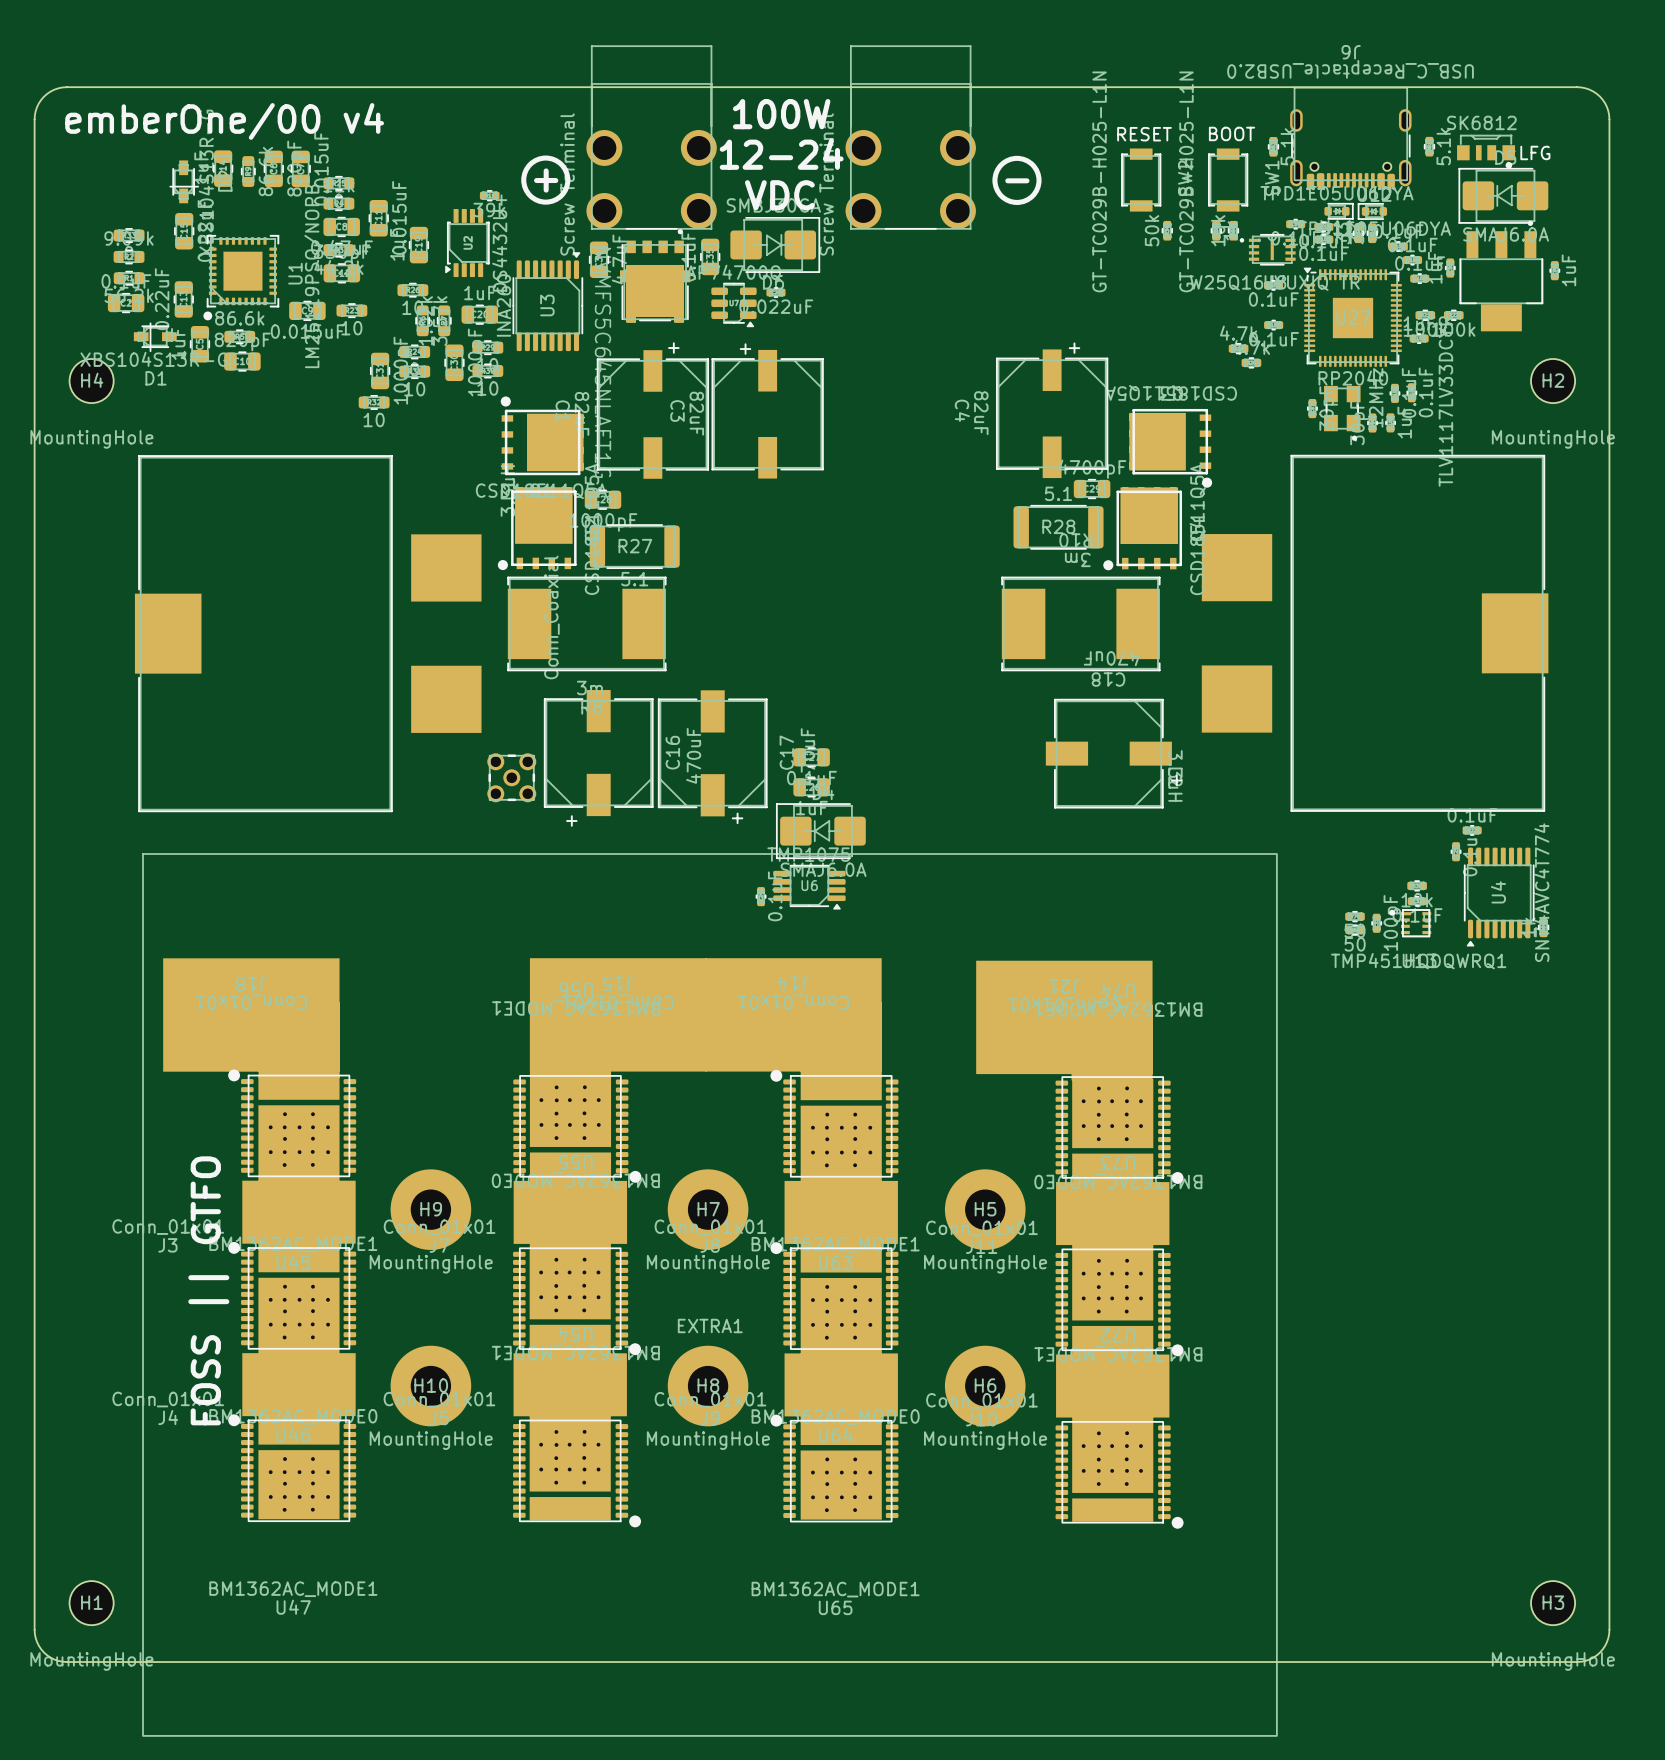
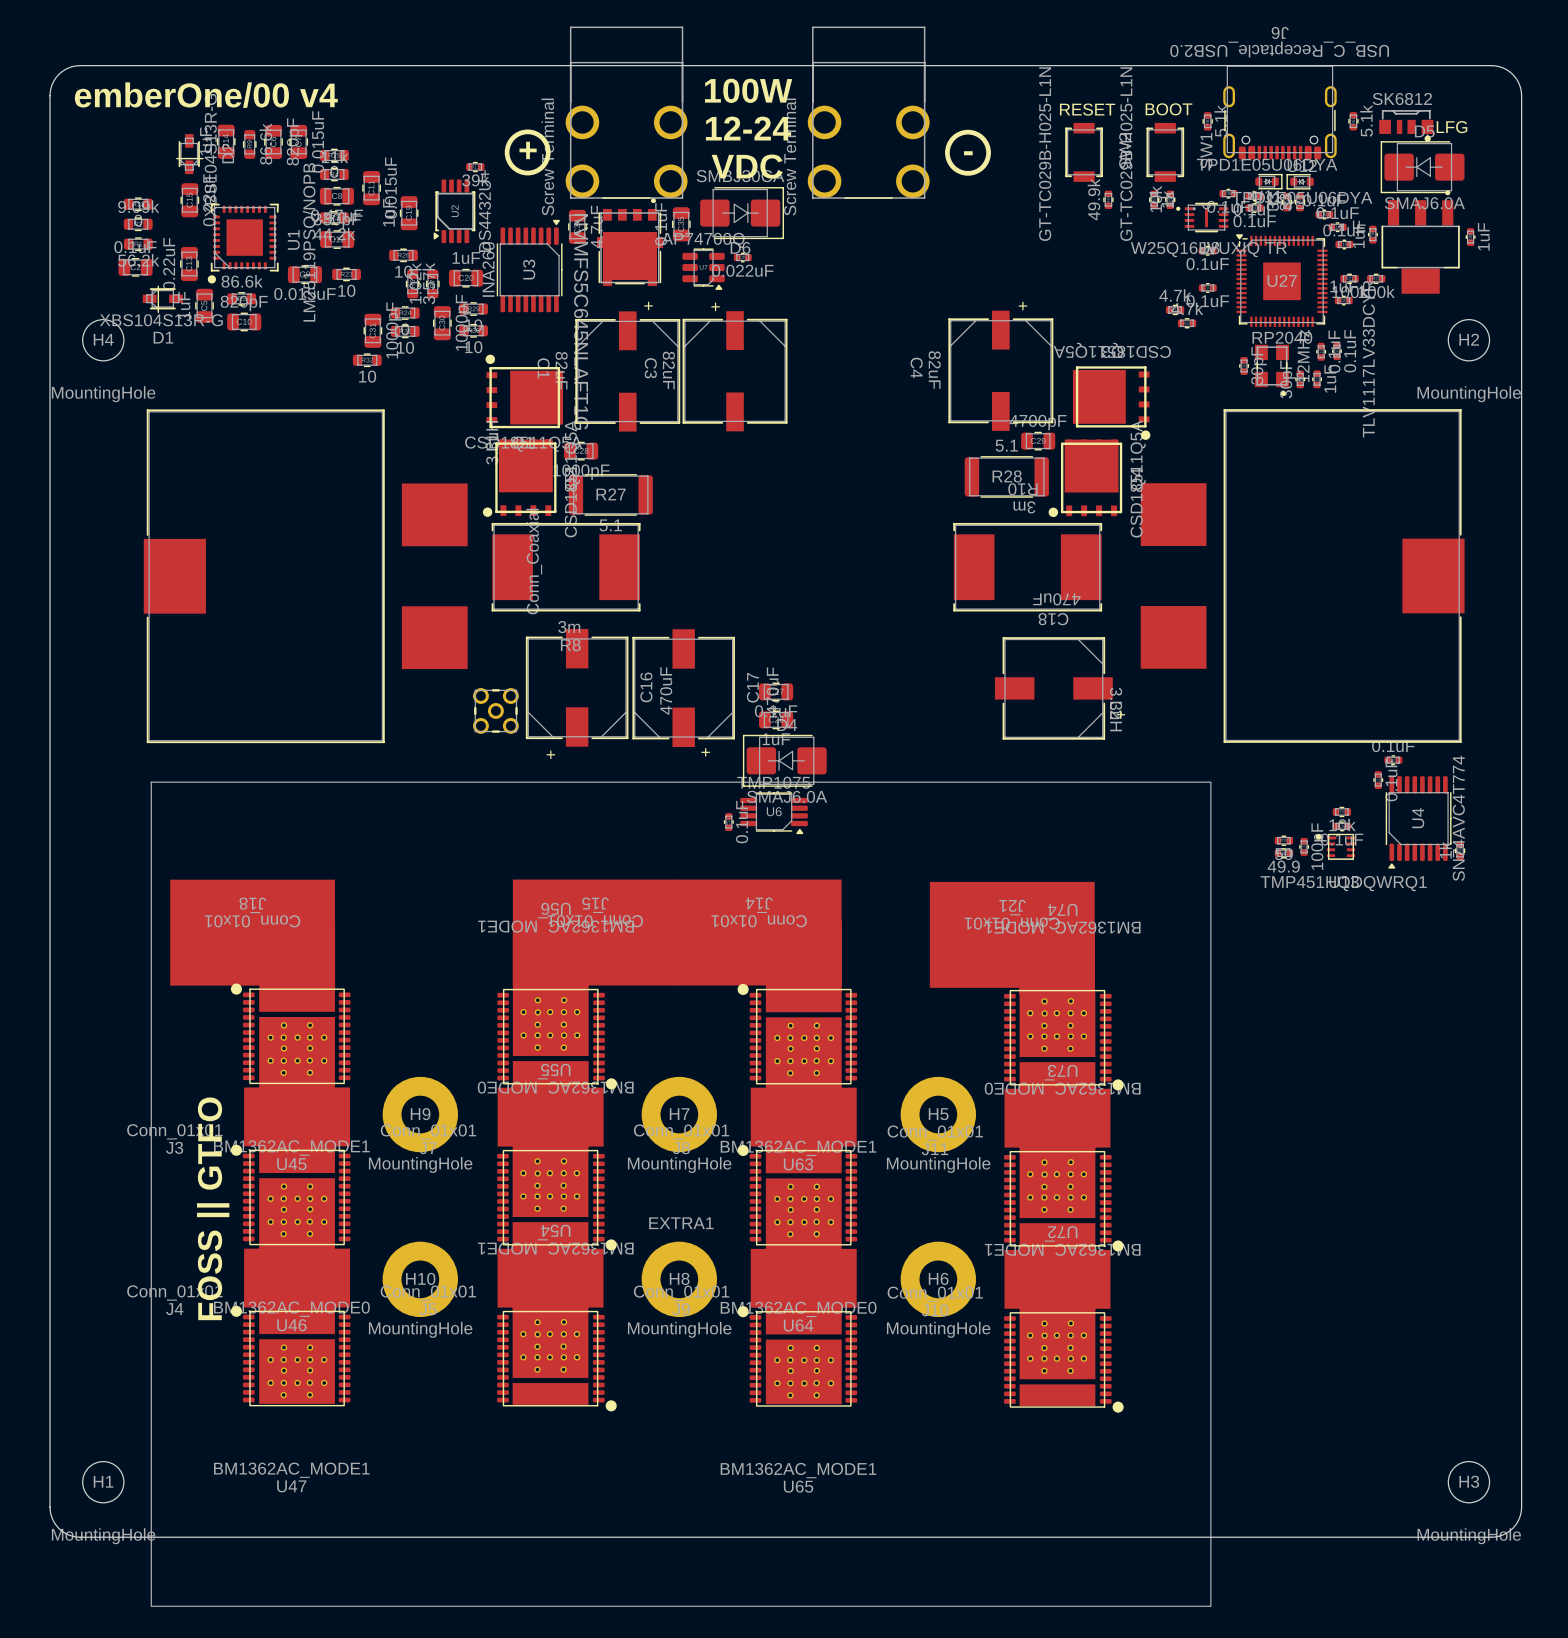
part value: 50k (1152, 230) -> 49.9k (1094, 199)
part value: 50 (1355, 944) -> 49.9 (1283, 866)

